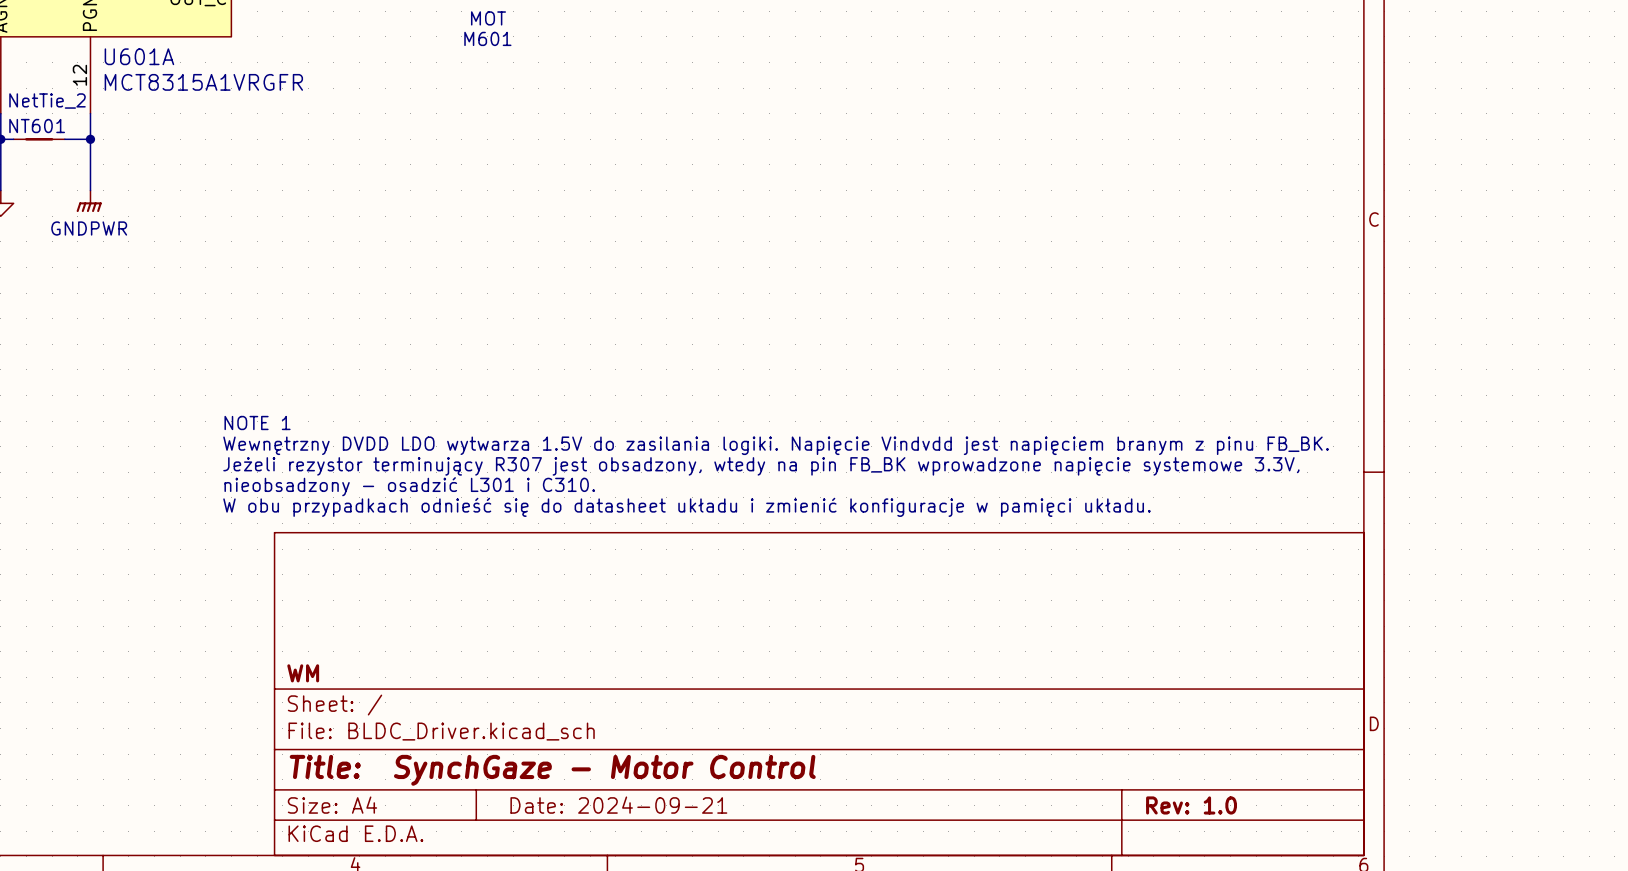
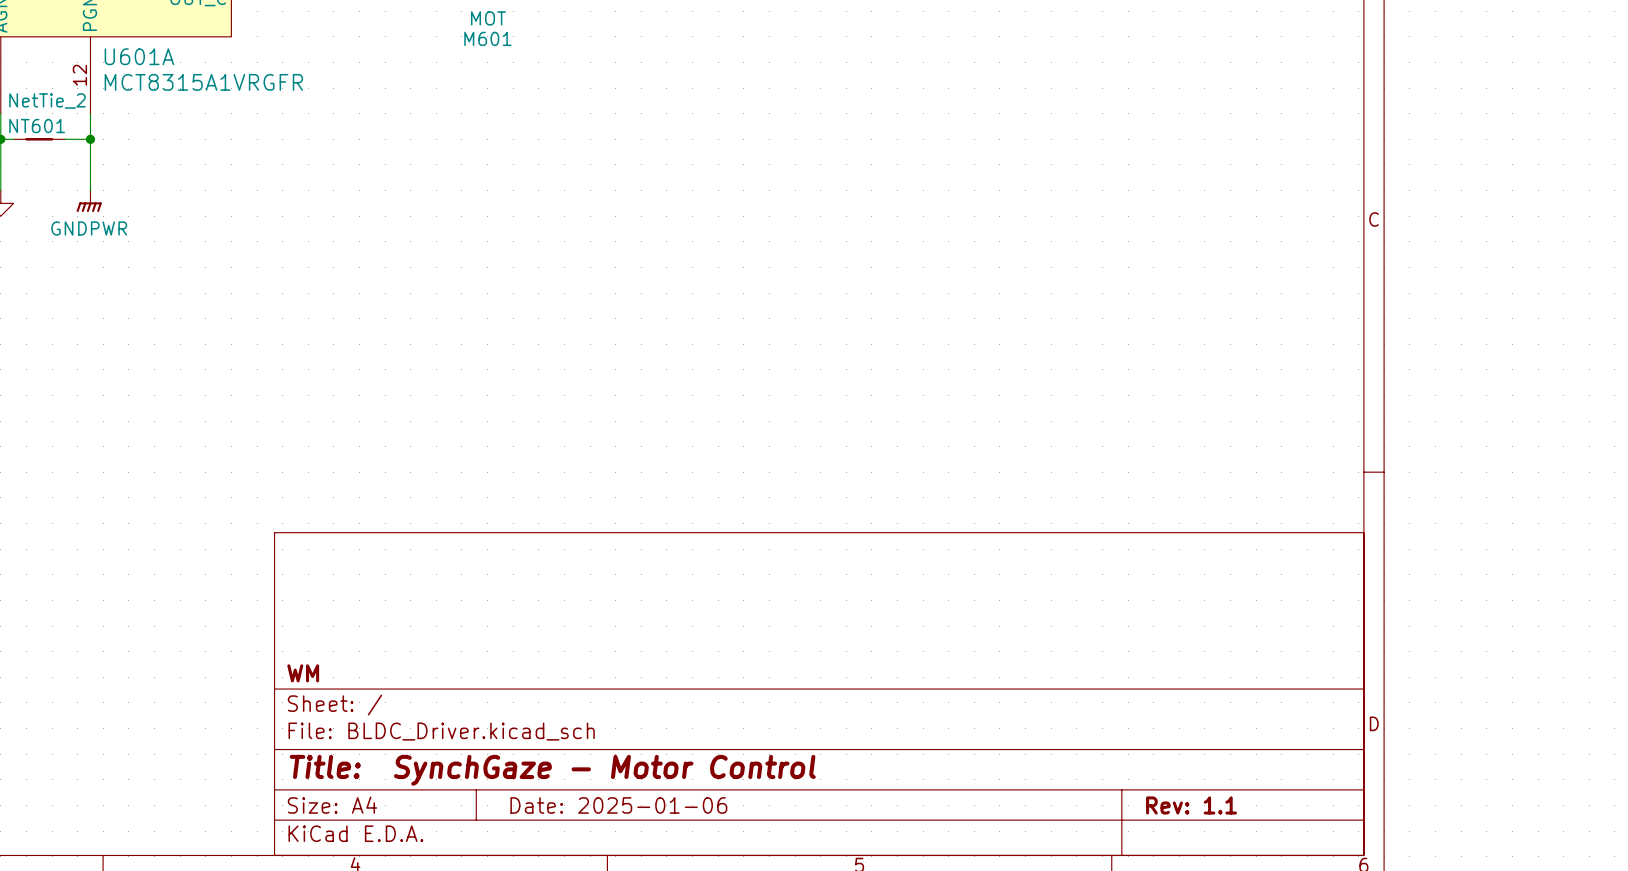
text: NOTE 1 (257, 423) -> none
text: Wewnętrzny DVDD LDO wytwarza 1.5V do zasilania logiki. Napięcie Vindvdd jest napięciem branym z pinu FB_BK. (776, 445) -> none
text: Jeżeli rezystor terminujący R307 jest obsadzony, wtedy na pin FB_BK wprowadzone napięcie systemowe 3.3V, (761, 466) -> none
text: nieobsadzony - osadzić L301 i C310. (409, 486) -> none
text: W obu przypadkach odnieść się do datasheet układu i zmienić konfiguracje w pamięci układu. (686, 507) -> none
title block: Date: 2024-09-21 (618, 805) -> Date: 2025-01-06 (618, 805)
title block: Rev: 1.0 (1191, 805) -> Rev: 1.1 (1191, 805)

